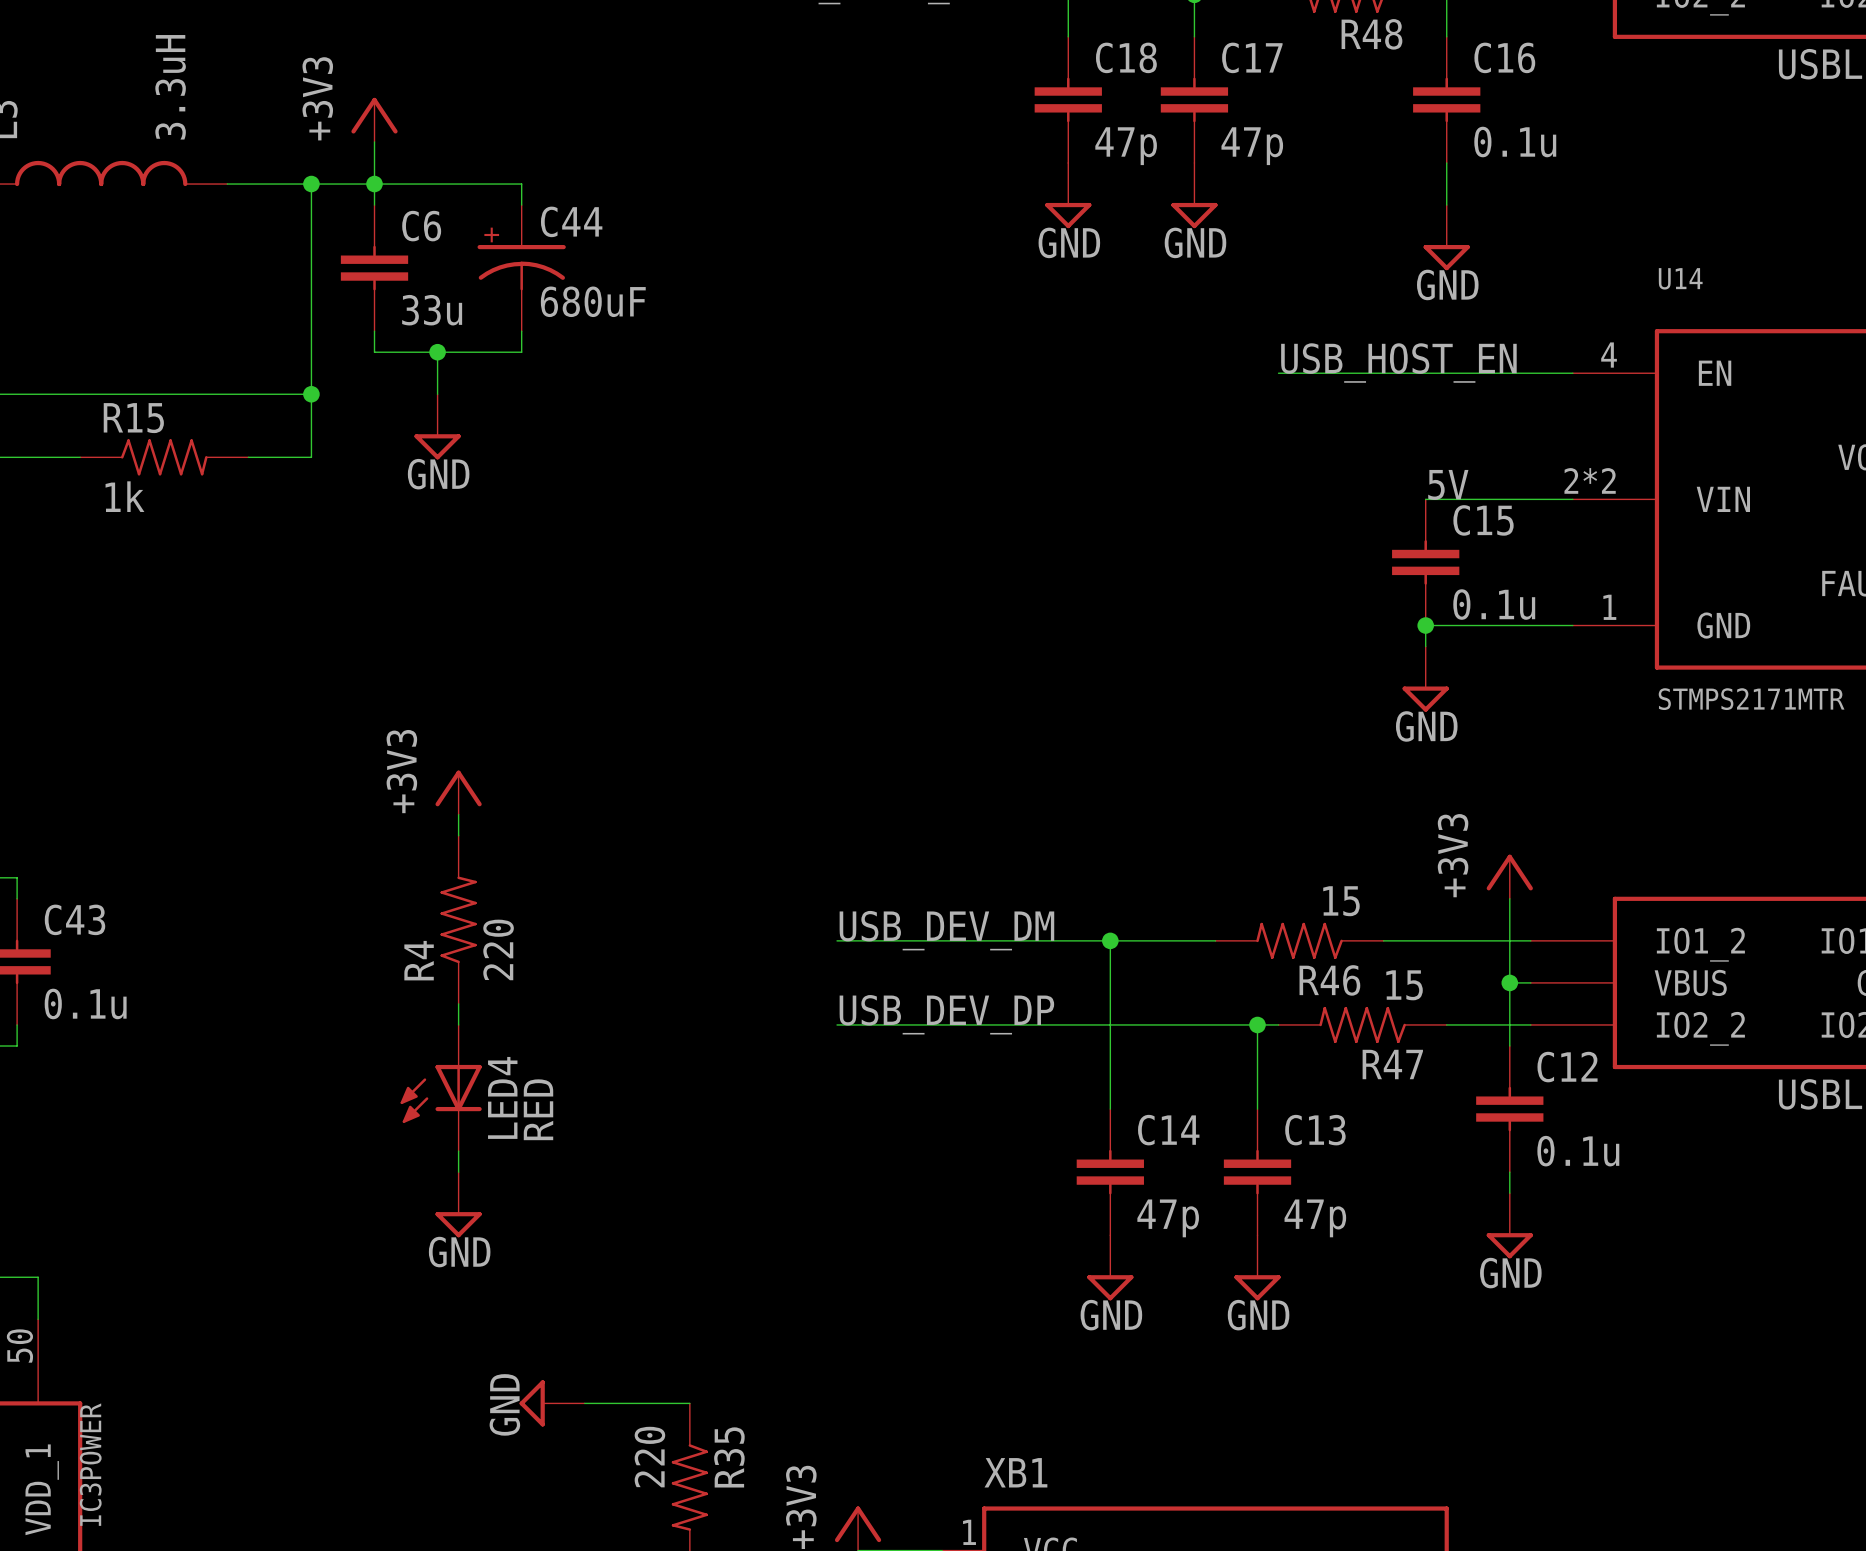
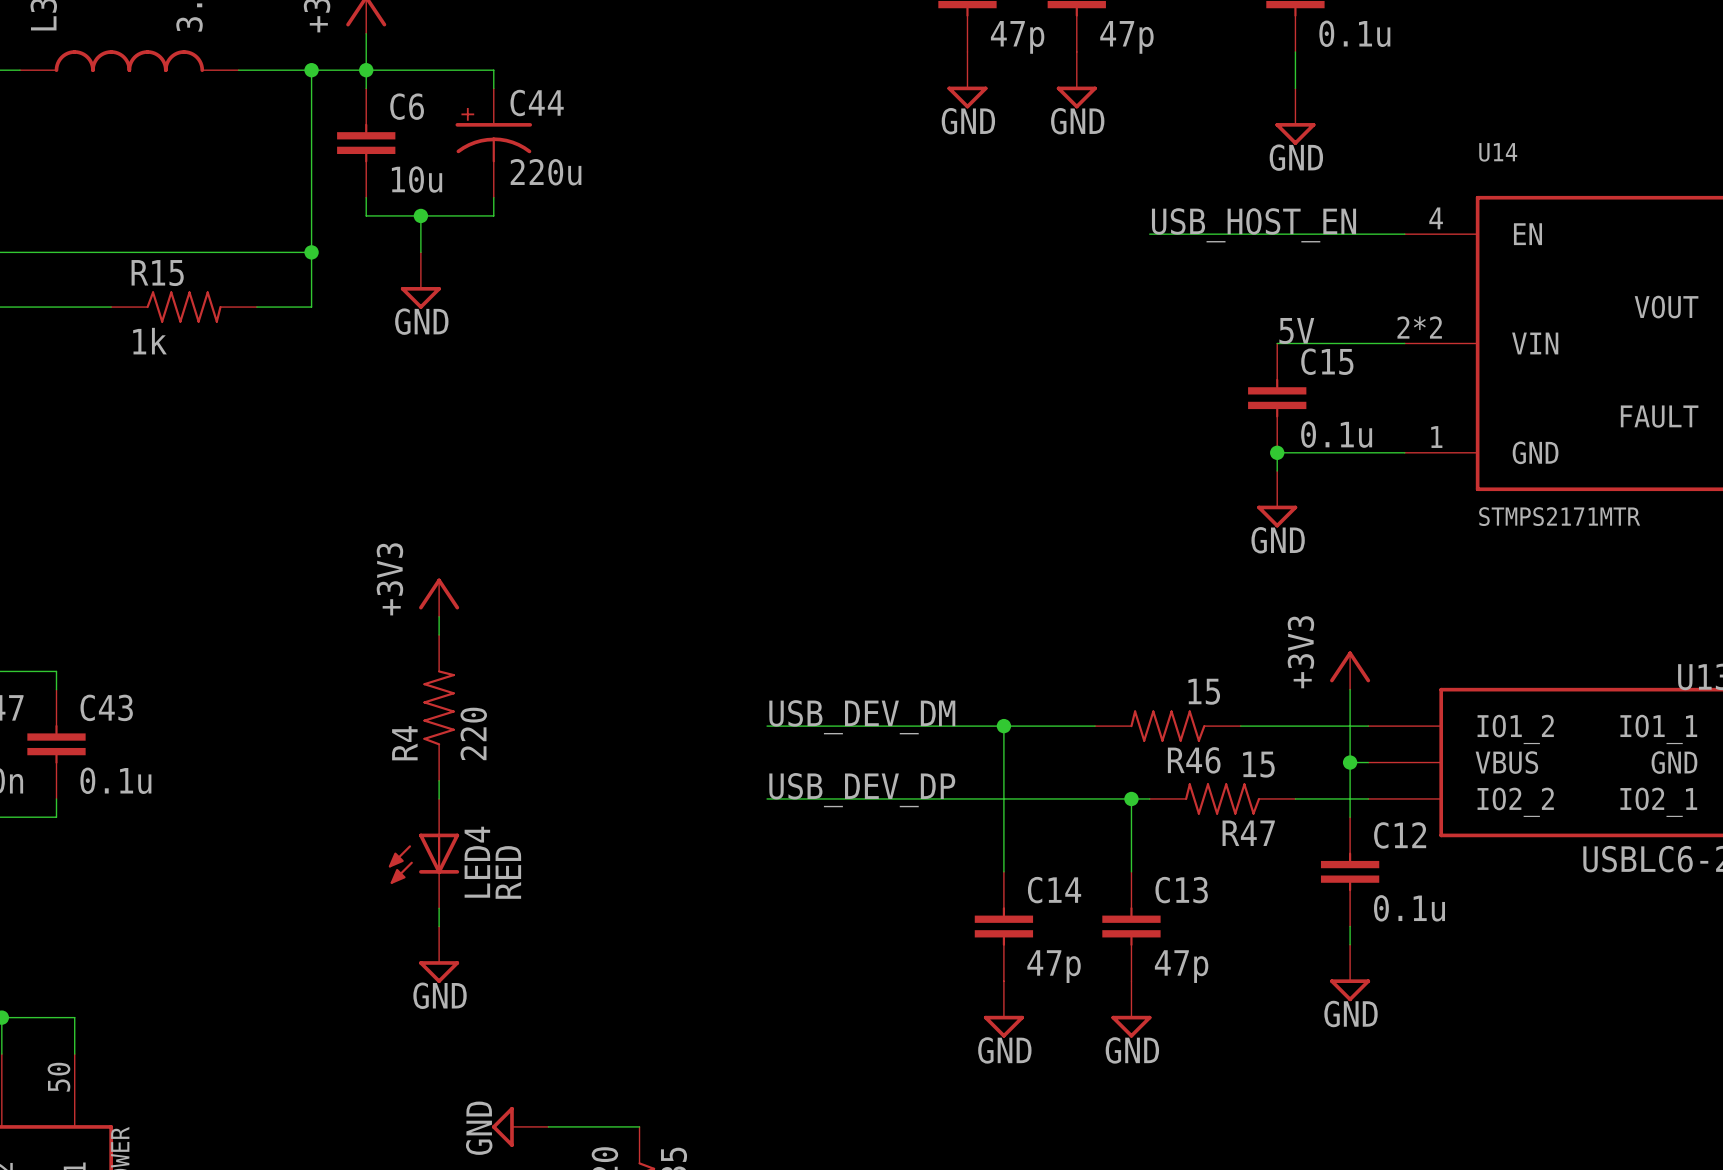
C44 value: 680uF (593, 301) -> 220u (546, 172)
C6 value: 33u (432, 310) -> 10u (417, 179)

